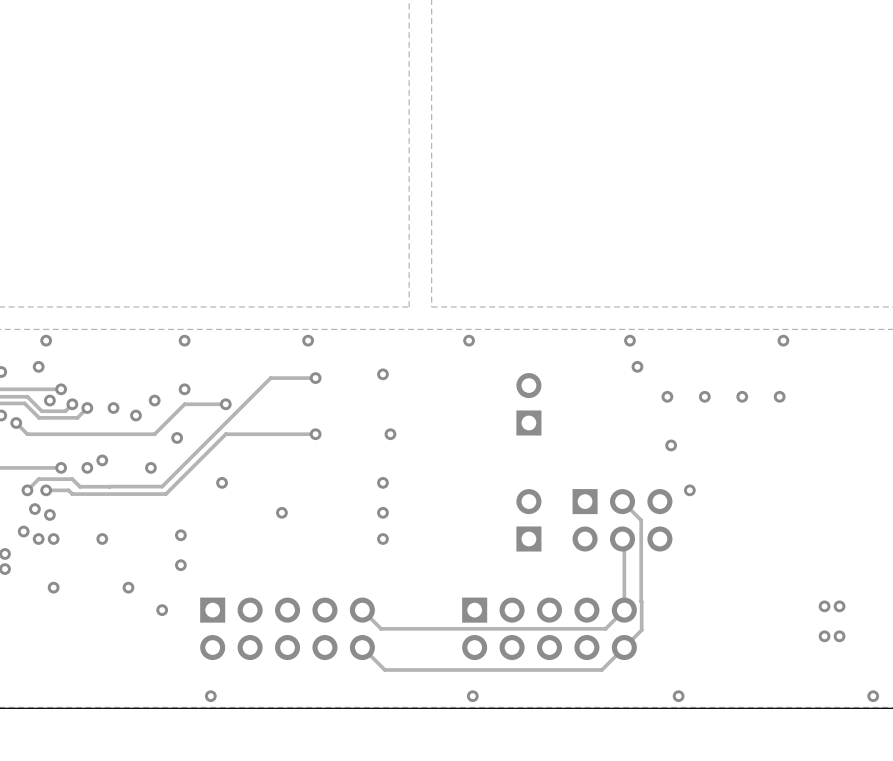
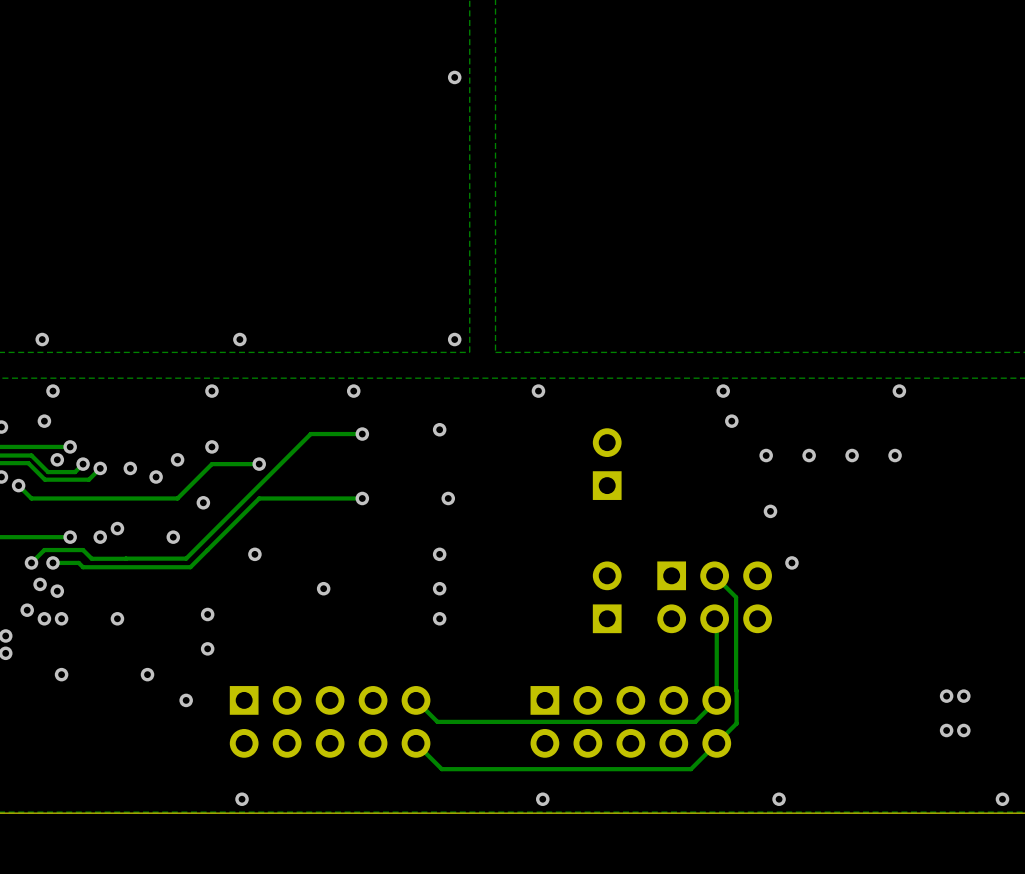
via: none -> (454, 77)
via: none -> (42, 339)
via: none -> (239, 339)
via: none -> (454, 339)

